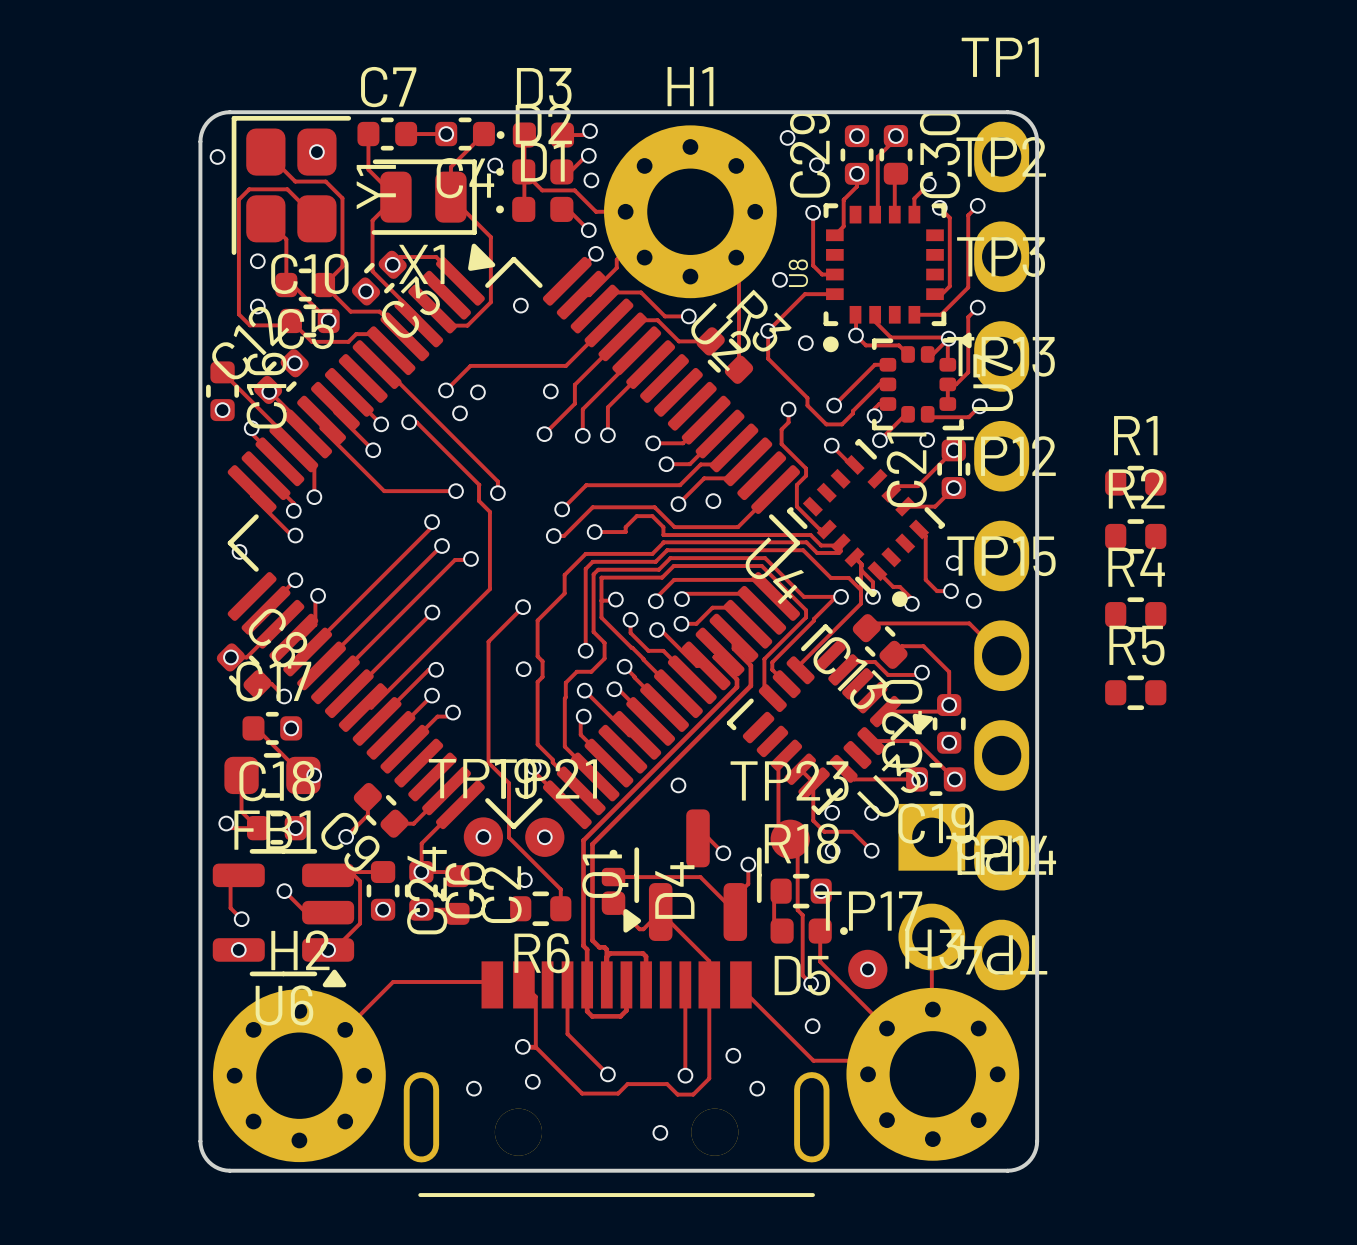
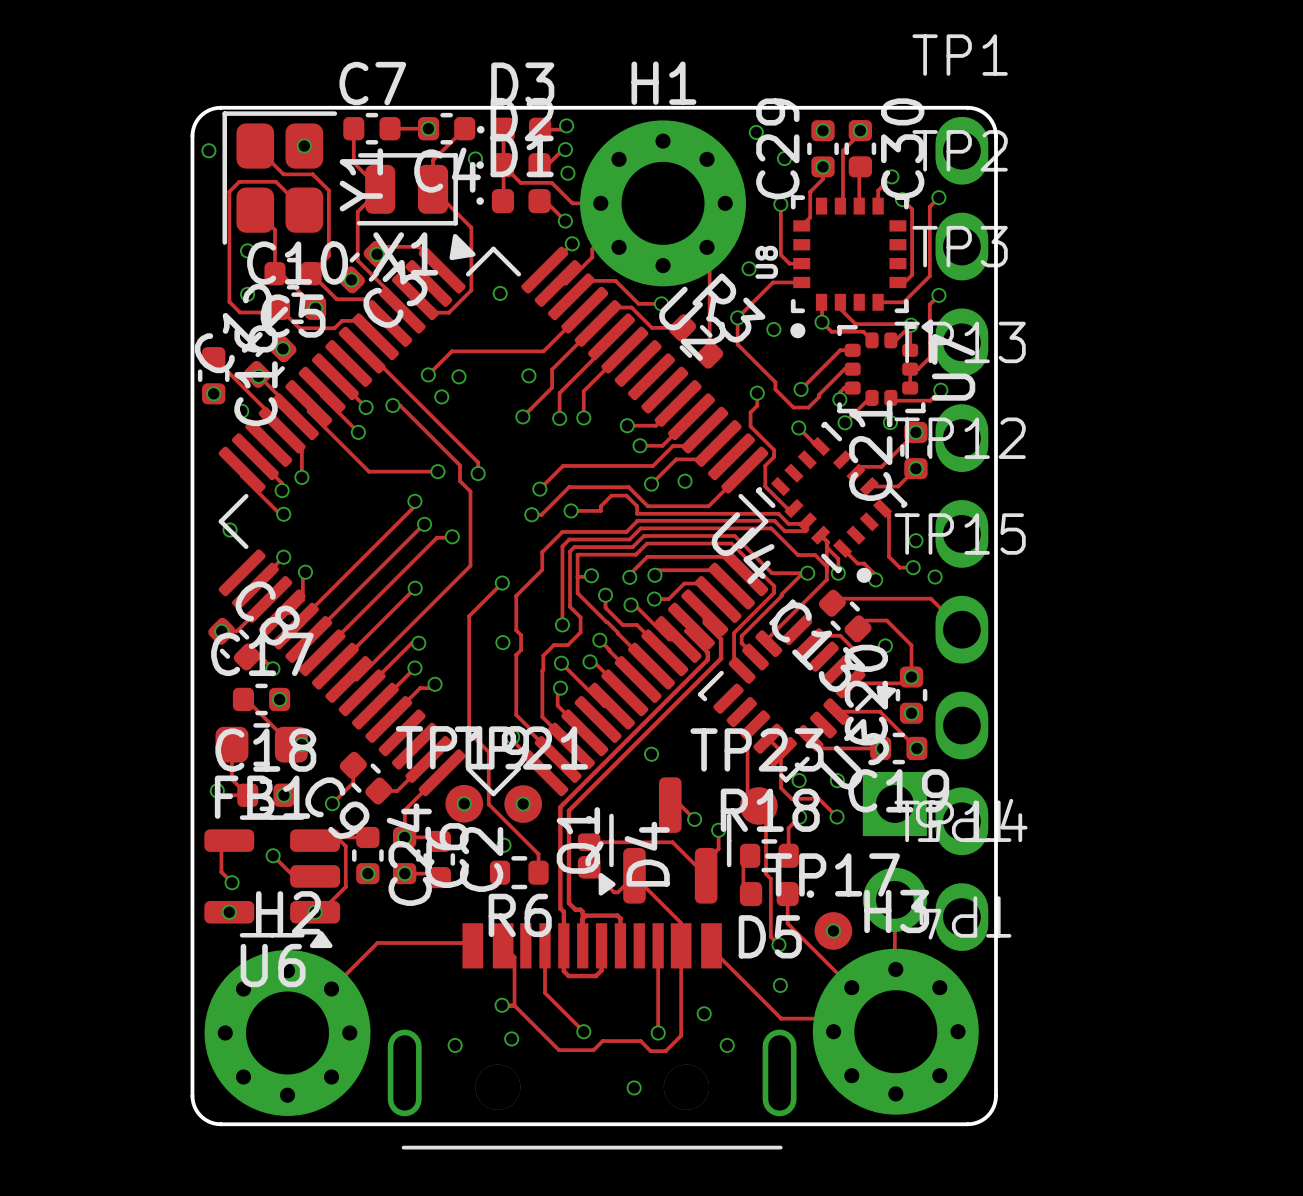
R1: (1135, 483) -> none
R2: (1135, 536) -> none
R4: (1135, 614) -> none
R5: (1135, 692) -> none
track: none -> (799, 817) (788, 828) (788, 855)
via: (821, 891) -> none

